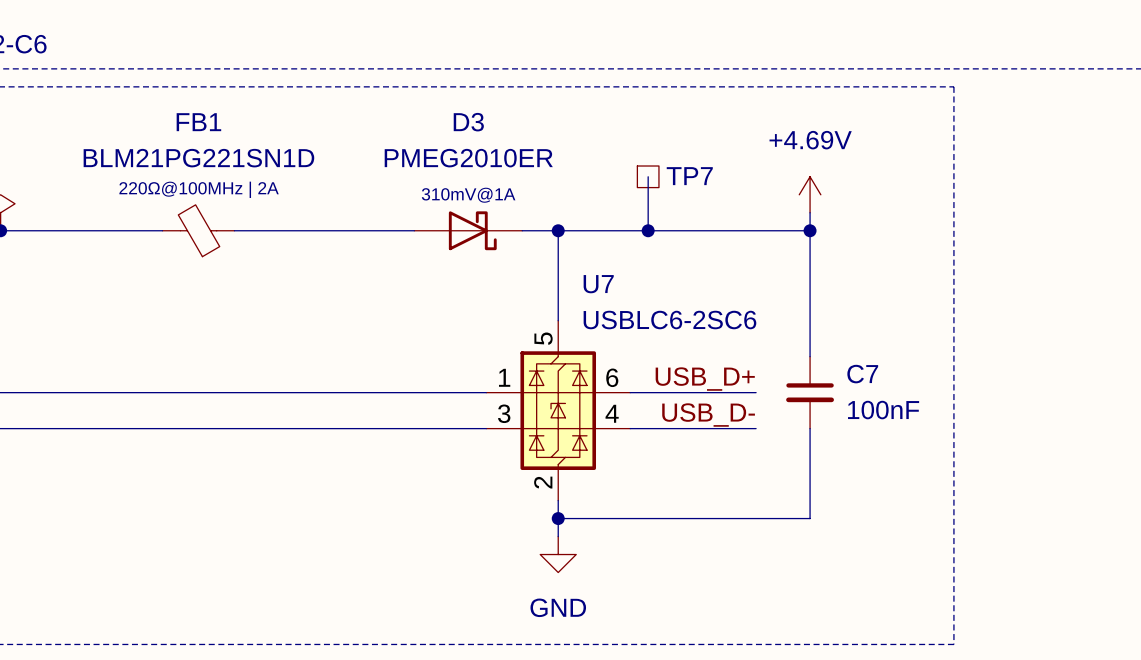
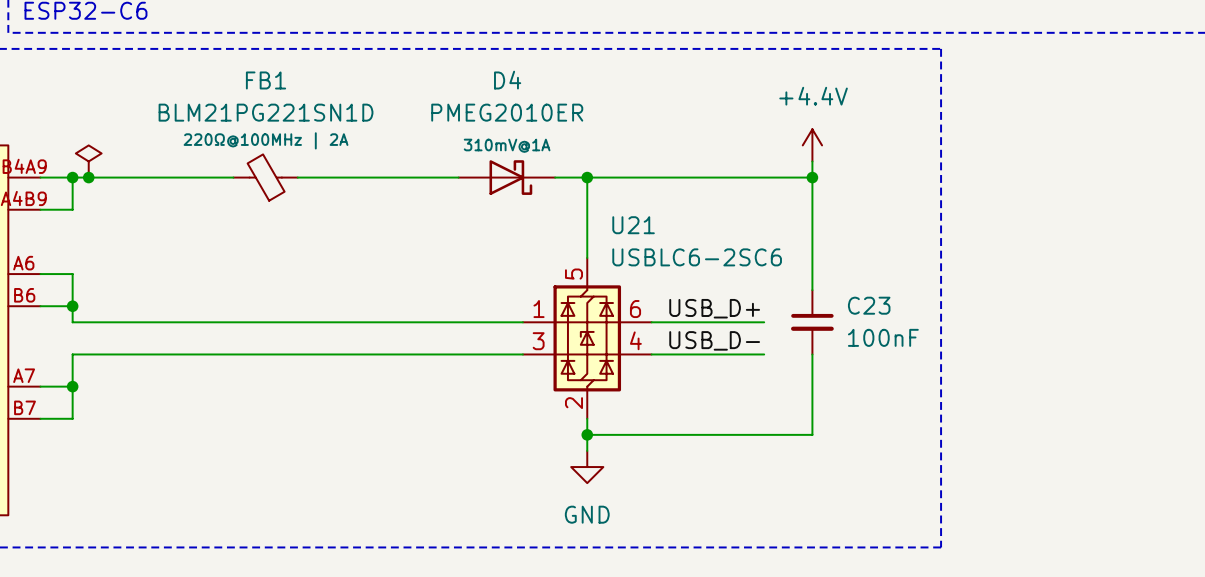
D3 name: D3 (468, 122) -> D4 (507, 80)
wire: (648, 176) (648, 230) -> none
TP7: (648, 176) -> none
power symbol: +4.69V (810, 194) -> +4.4V (812, 145)
junction: (648, 230) -> none
U7 name: U7 (598, 284) -> U21 (633, 225)
C7 name: C7 (862, 374) -> C23 (869, 305)

